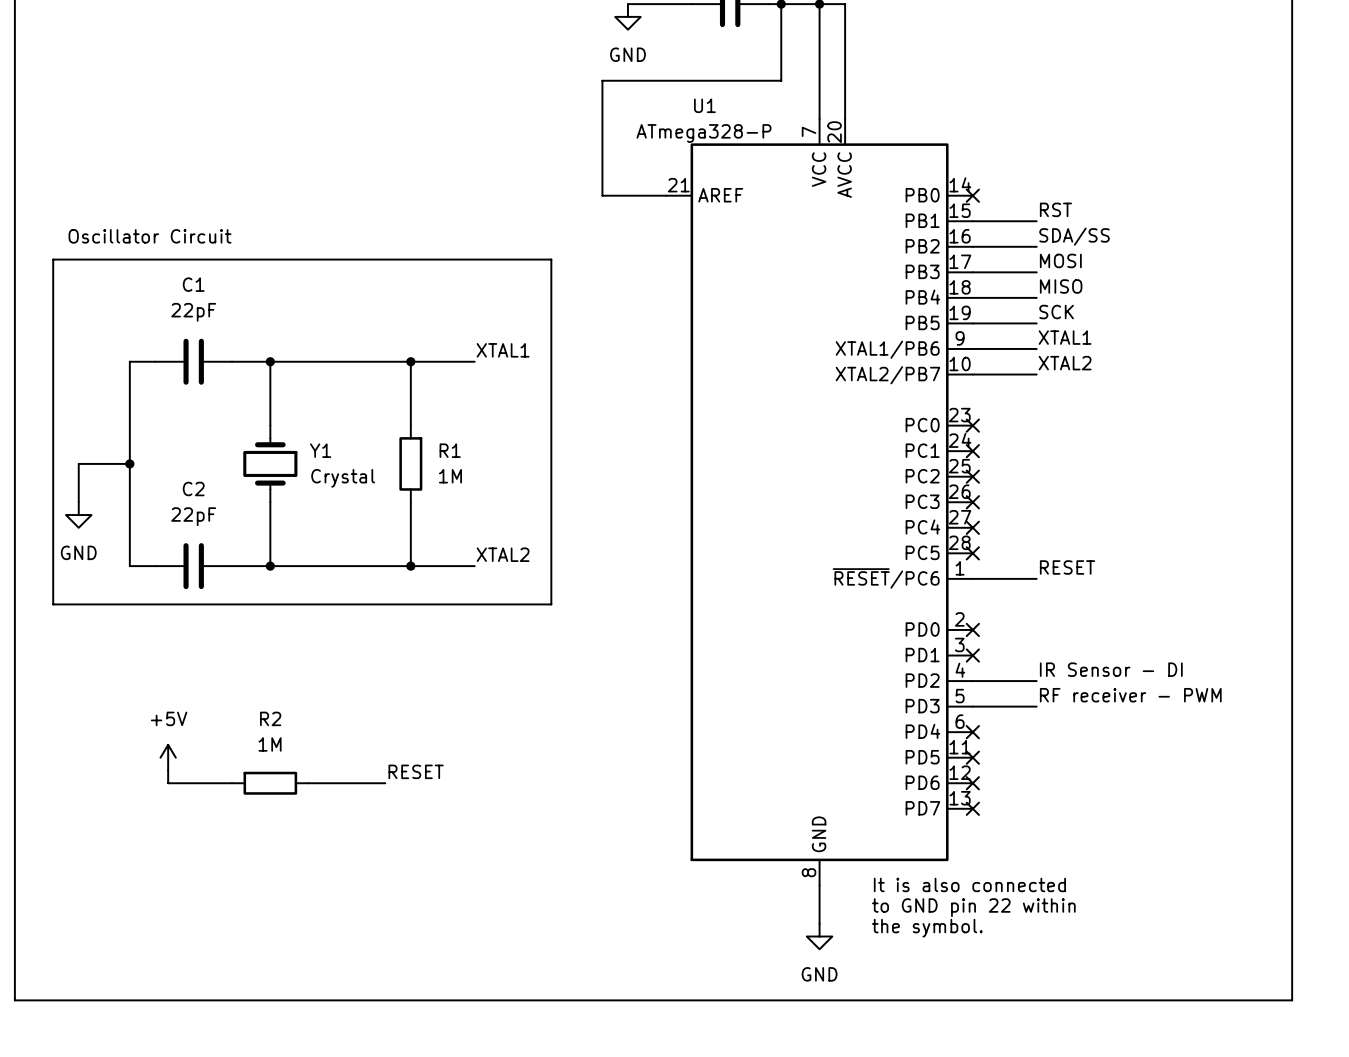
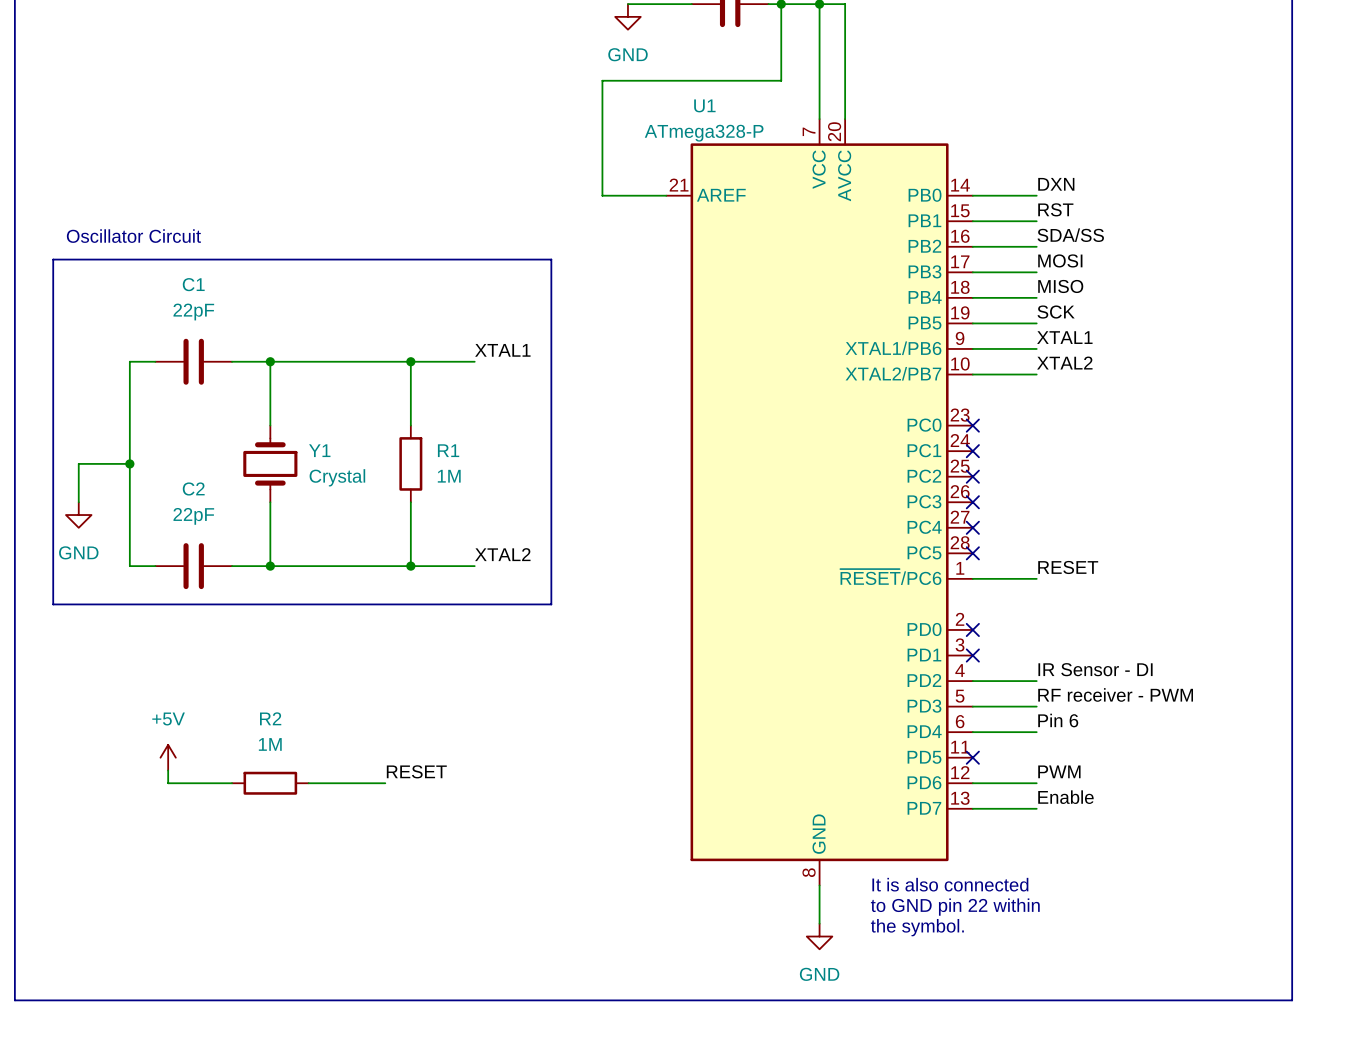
label: none -> DXN (1056, 184)
wire: none -> (972, 195) (1036, 195)
no-connect mark: (972, 195) -> none
label: none -> Pin 6 (1058, 720)
wire: none -> (972, 732) (1036, 732)
no-connect mark: (972, 732) -> none
label: none -> PWM (1059, 771)
wire: none -> (972, 783) (1036, 783)
no-connect mark: (972, 783) -> none
label: none -> Enable (1065, 797)
wire: none -> (972, 808) (1036, 808)
no-connect mark: (972, 808) -> none

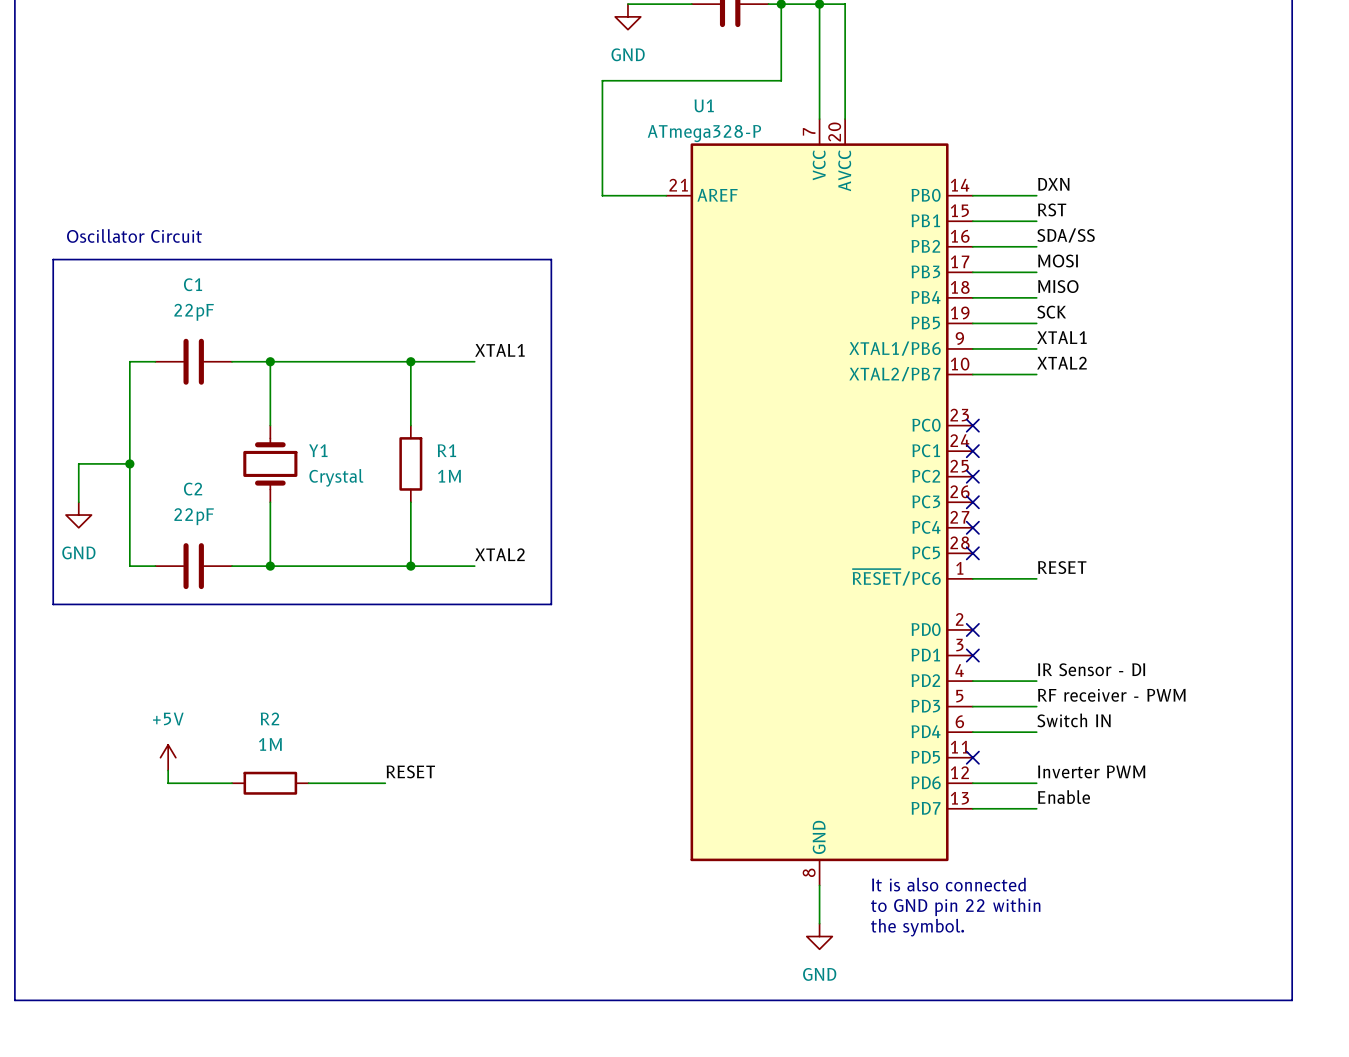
label: Pin 6 (1058, 720) -> Switch IN (1074, 720)
label: PWM (1059, 771) -> Inverter PWM (1091, 771)

